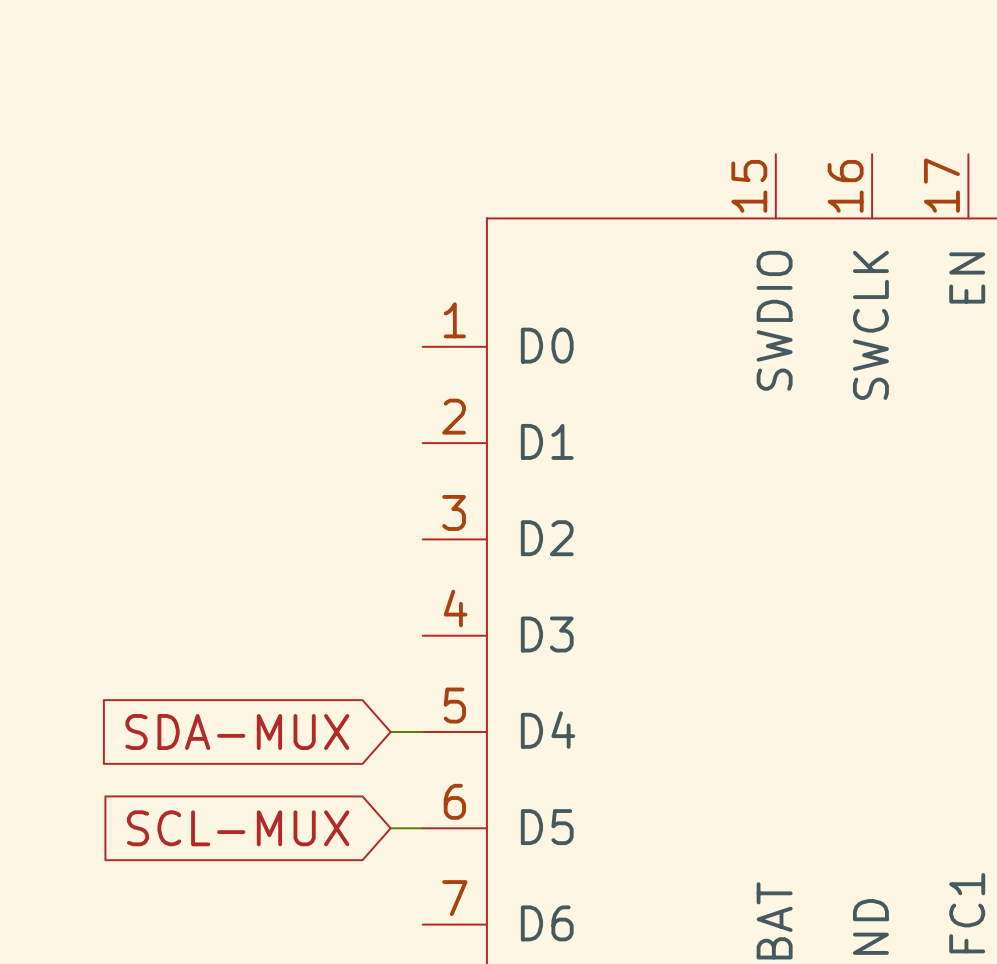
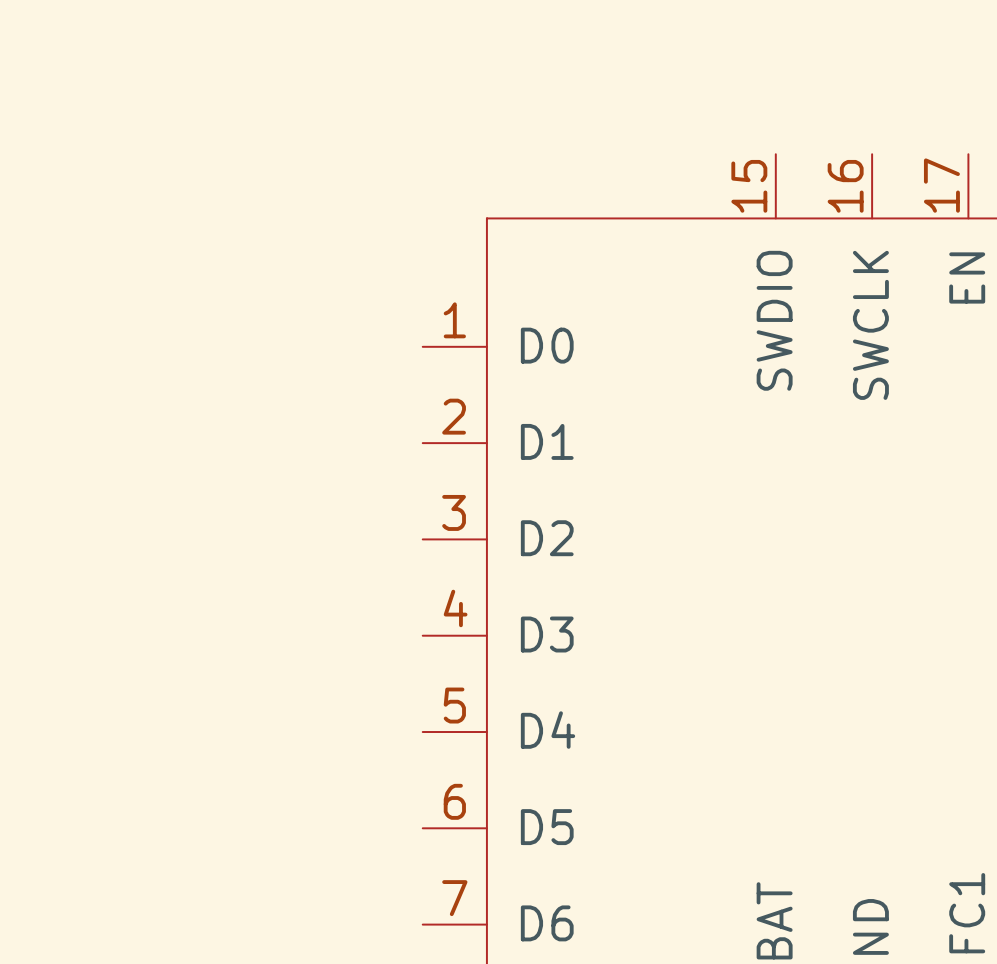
global label: SDA-MUX (237, 732) -> none
wire: (390, 732) (422, 732) -> none
global label: SCL-MUX (238, 828) -> none
wire: (390, 828) (422, 828) -> none

